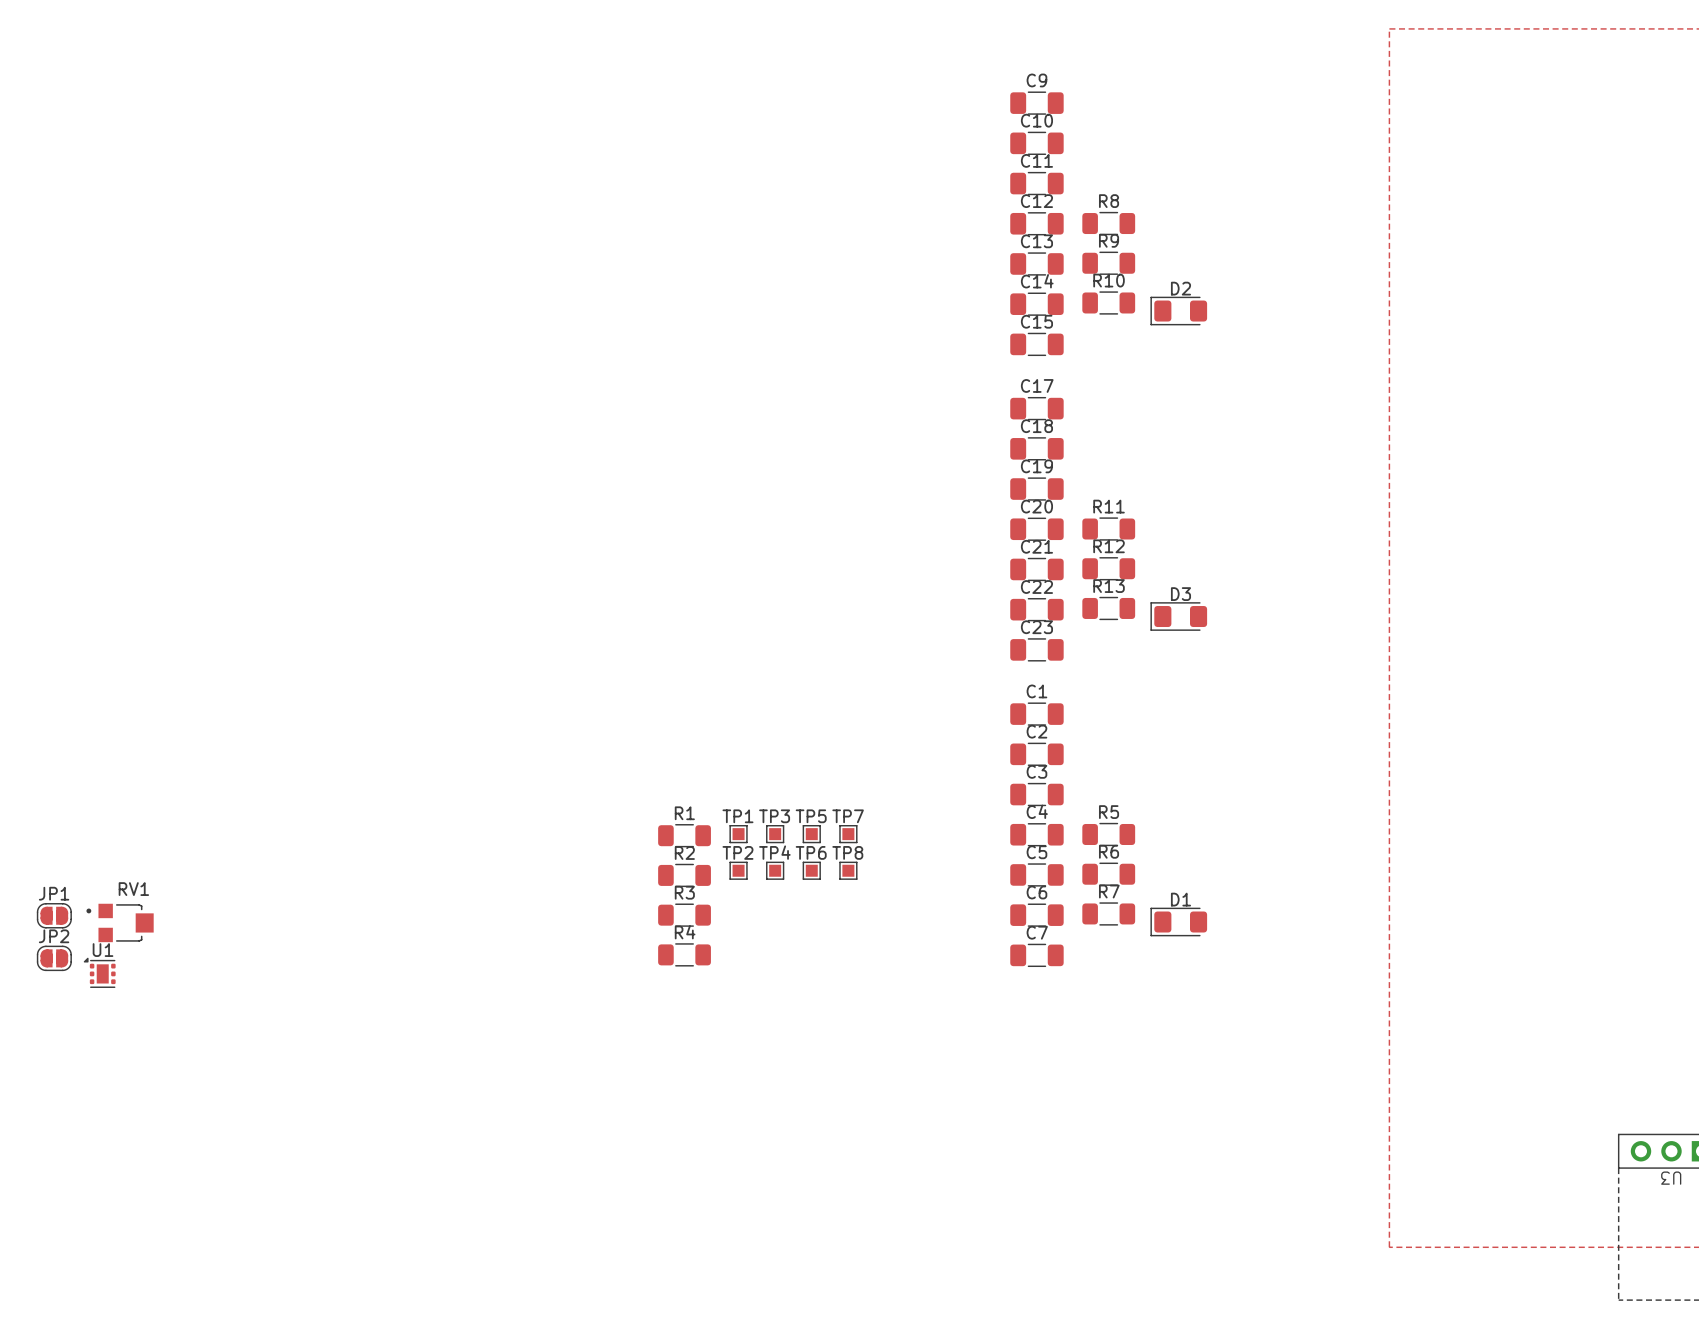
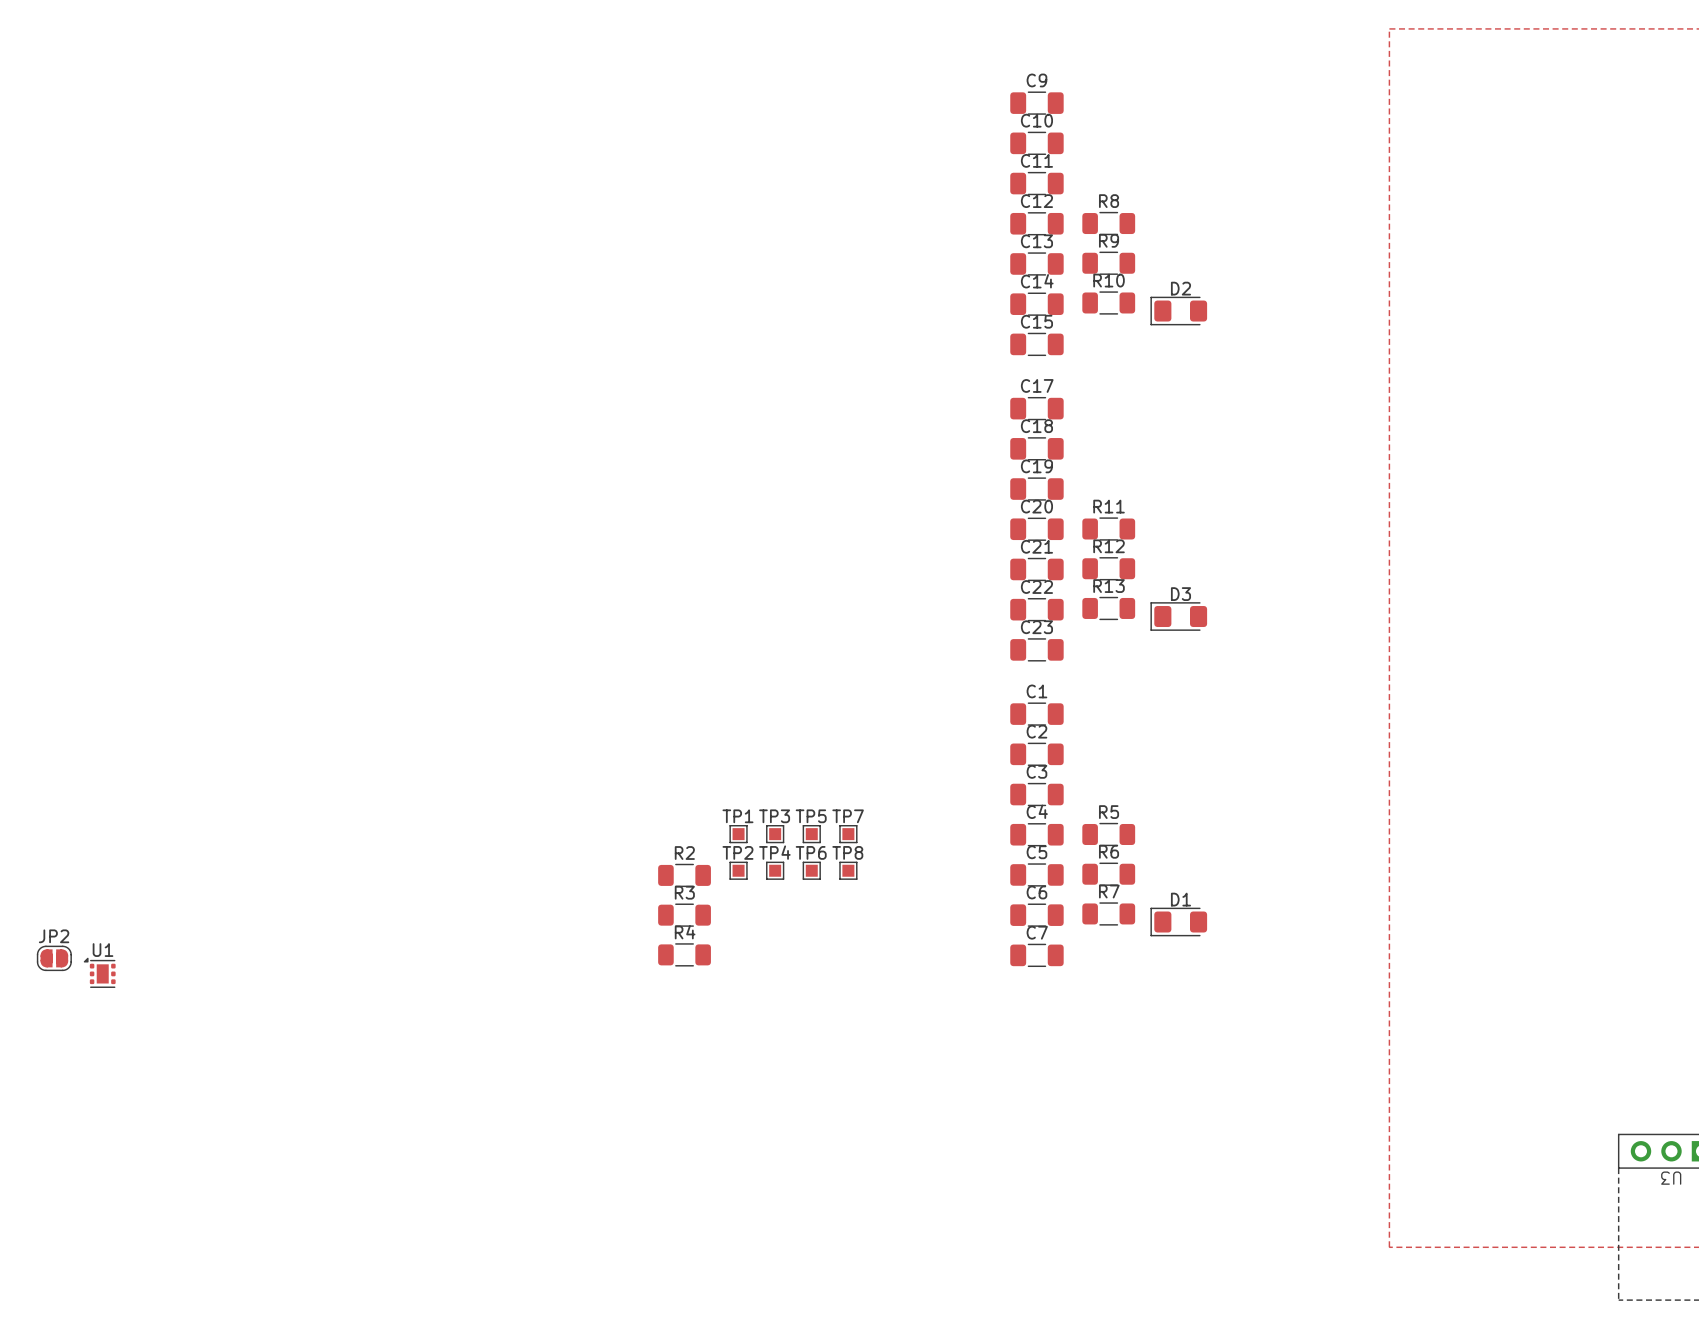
R1: (684, 835) -> none
JP1: (54, 915) -> none
RV1: (120, 922) -> none

